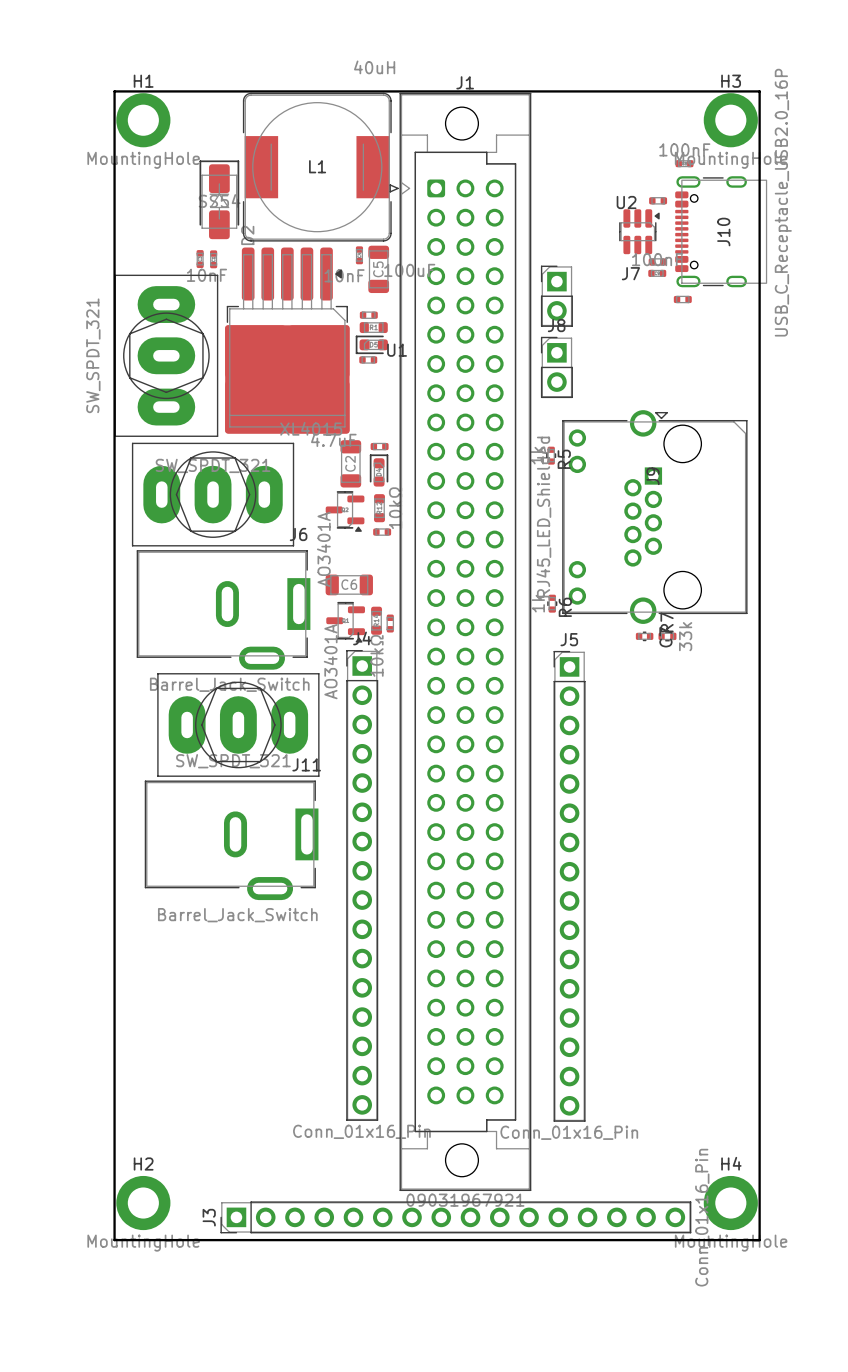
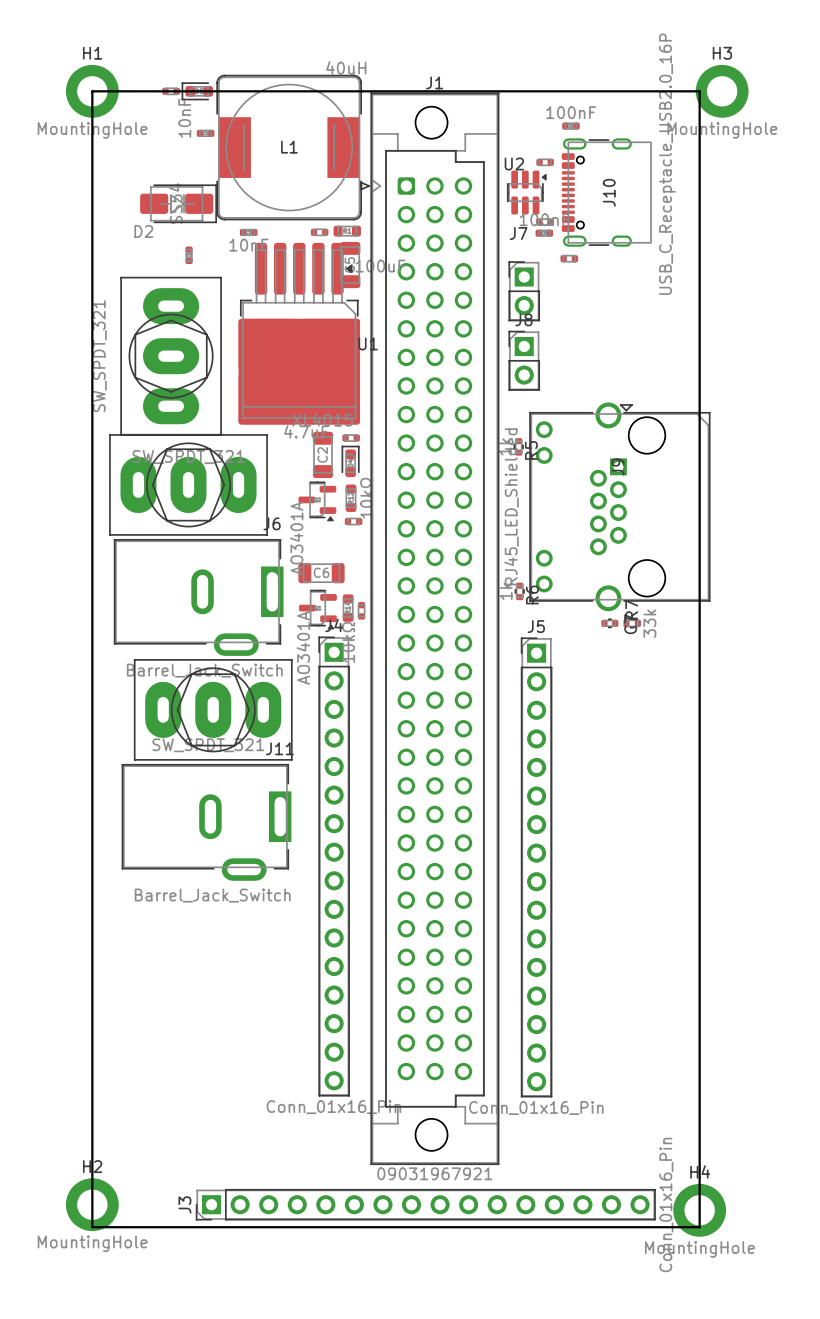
part: none -> (171, 91)
board edge: (736, 91) (759, 91) (759, 1240) (114, 1240) -> (699, 91) (699, 1227) (92, 1227) (92, 1212)
H1 position: (143, 120) -> (92, 91)
H3 position: (730, 120) -> (722, 91)
part position: (684, 163) -> (570, 126)
part: none -> (545, 162)
L1 position: (317, 167) -> (289, 147)
D2 rotation: 0° (219, 199) -> 90° clockwise (178, 203)
part: (658, 200) -> none
part: none -> (544, 222)
U2 position: (639, 231) -> (526, 192)
J10 position: (721, 231) -> (606, 192)
part: none -> (319, 232)
part rotation: 0° (359, 255) -> 90° clockwise (205, 133)
part position: (359, 255) -> (205, 133)
part rotation: 0° (200, 259) -> 90° clockwise (248, 232)
part position: (200, 259) -> (248, 232)
part: (657, 261) -> none
part: none -> (569, 258)
J7 name position: J7 (630, 273) -> J7 (518, 233)
part position: (657, 273) -> (544, 233)
part: (682, 299) -> none
part: (368, 315) -> none
part position: (373, 327) -> (347, 231)
U1 position: (287, 340) -> (299, 333)
part position: (371, 344) -> (197, 91)
part position: (166, 355) -> (171, 356)
part: (368, 359) -> none
H2 position: (143, 1203) -> (92, 1204)
H4 position: (730, 1203) -> (699, 1210)
J3 position: (455, 1217) -> (425, 1204)

